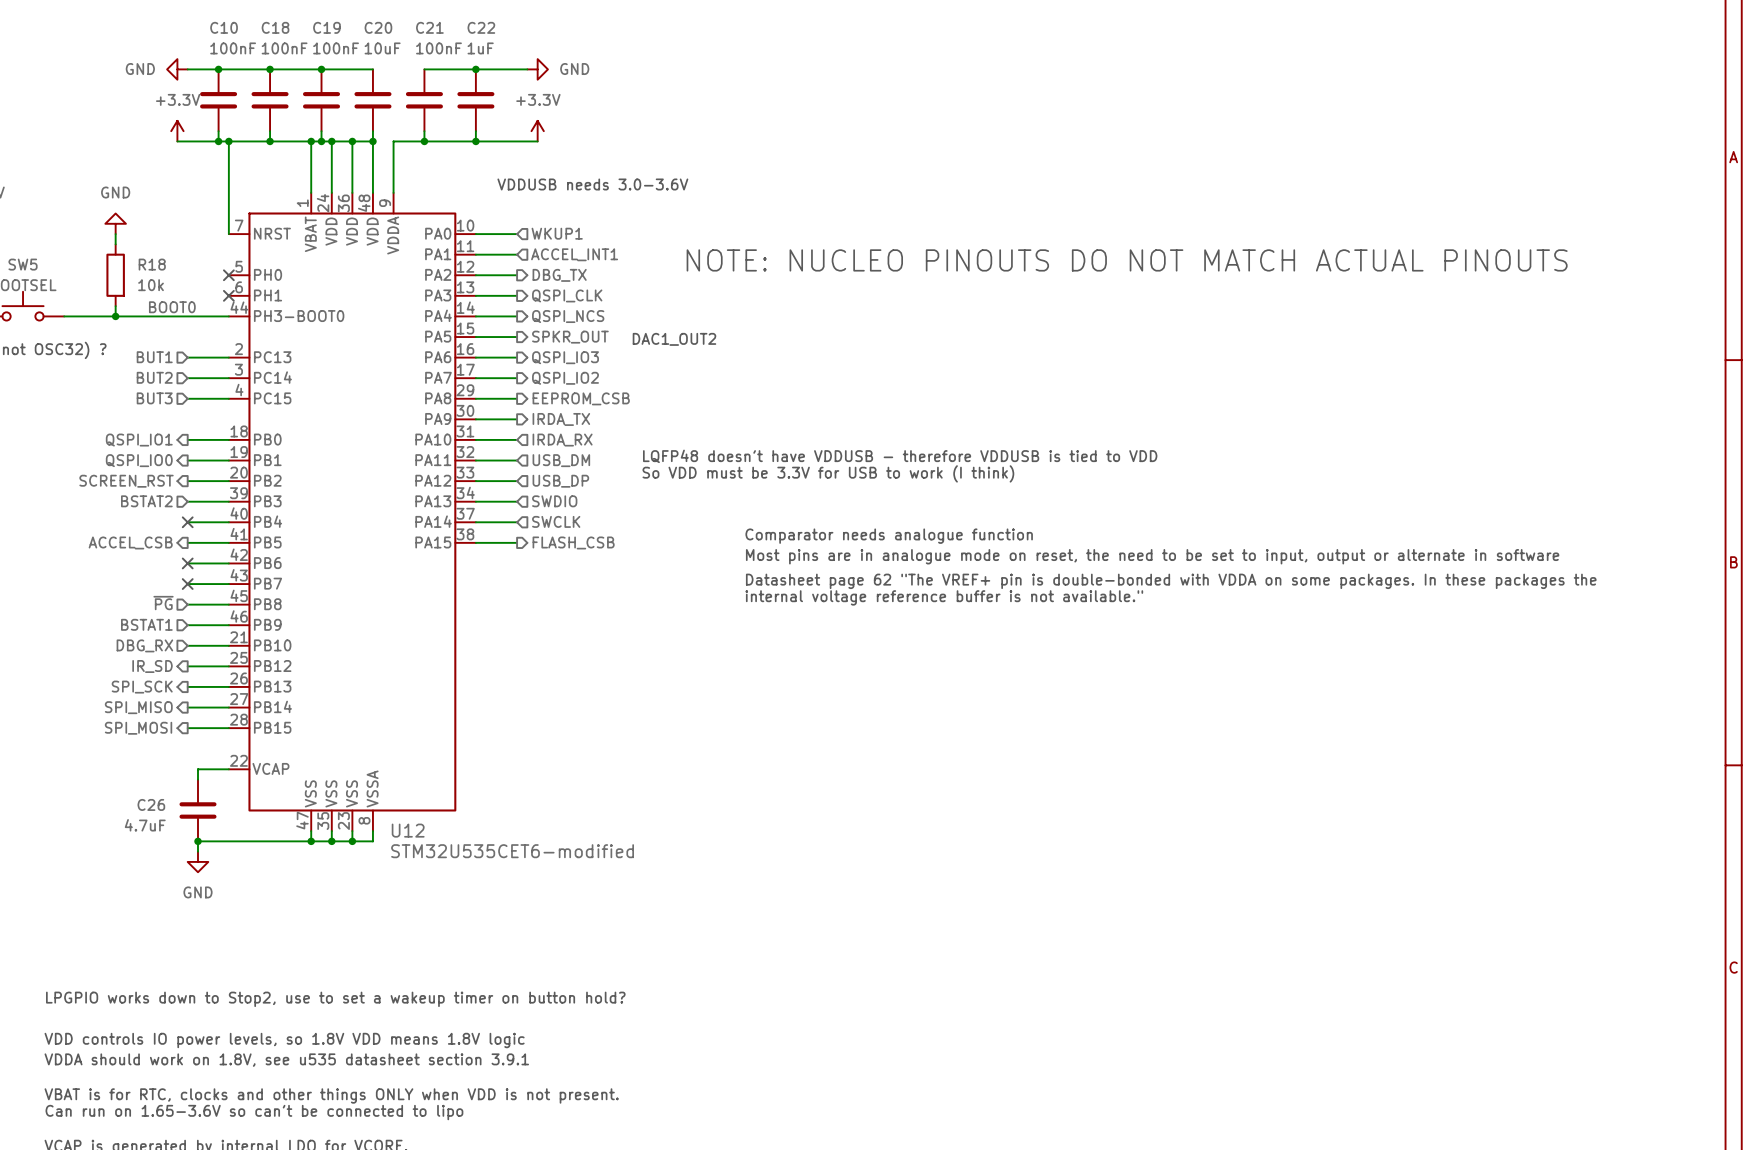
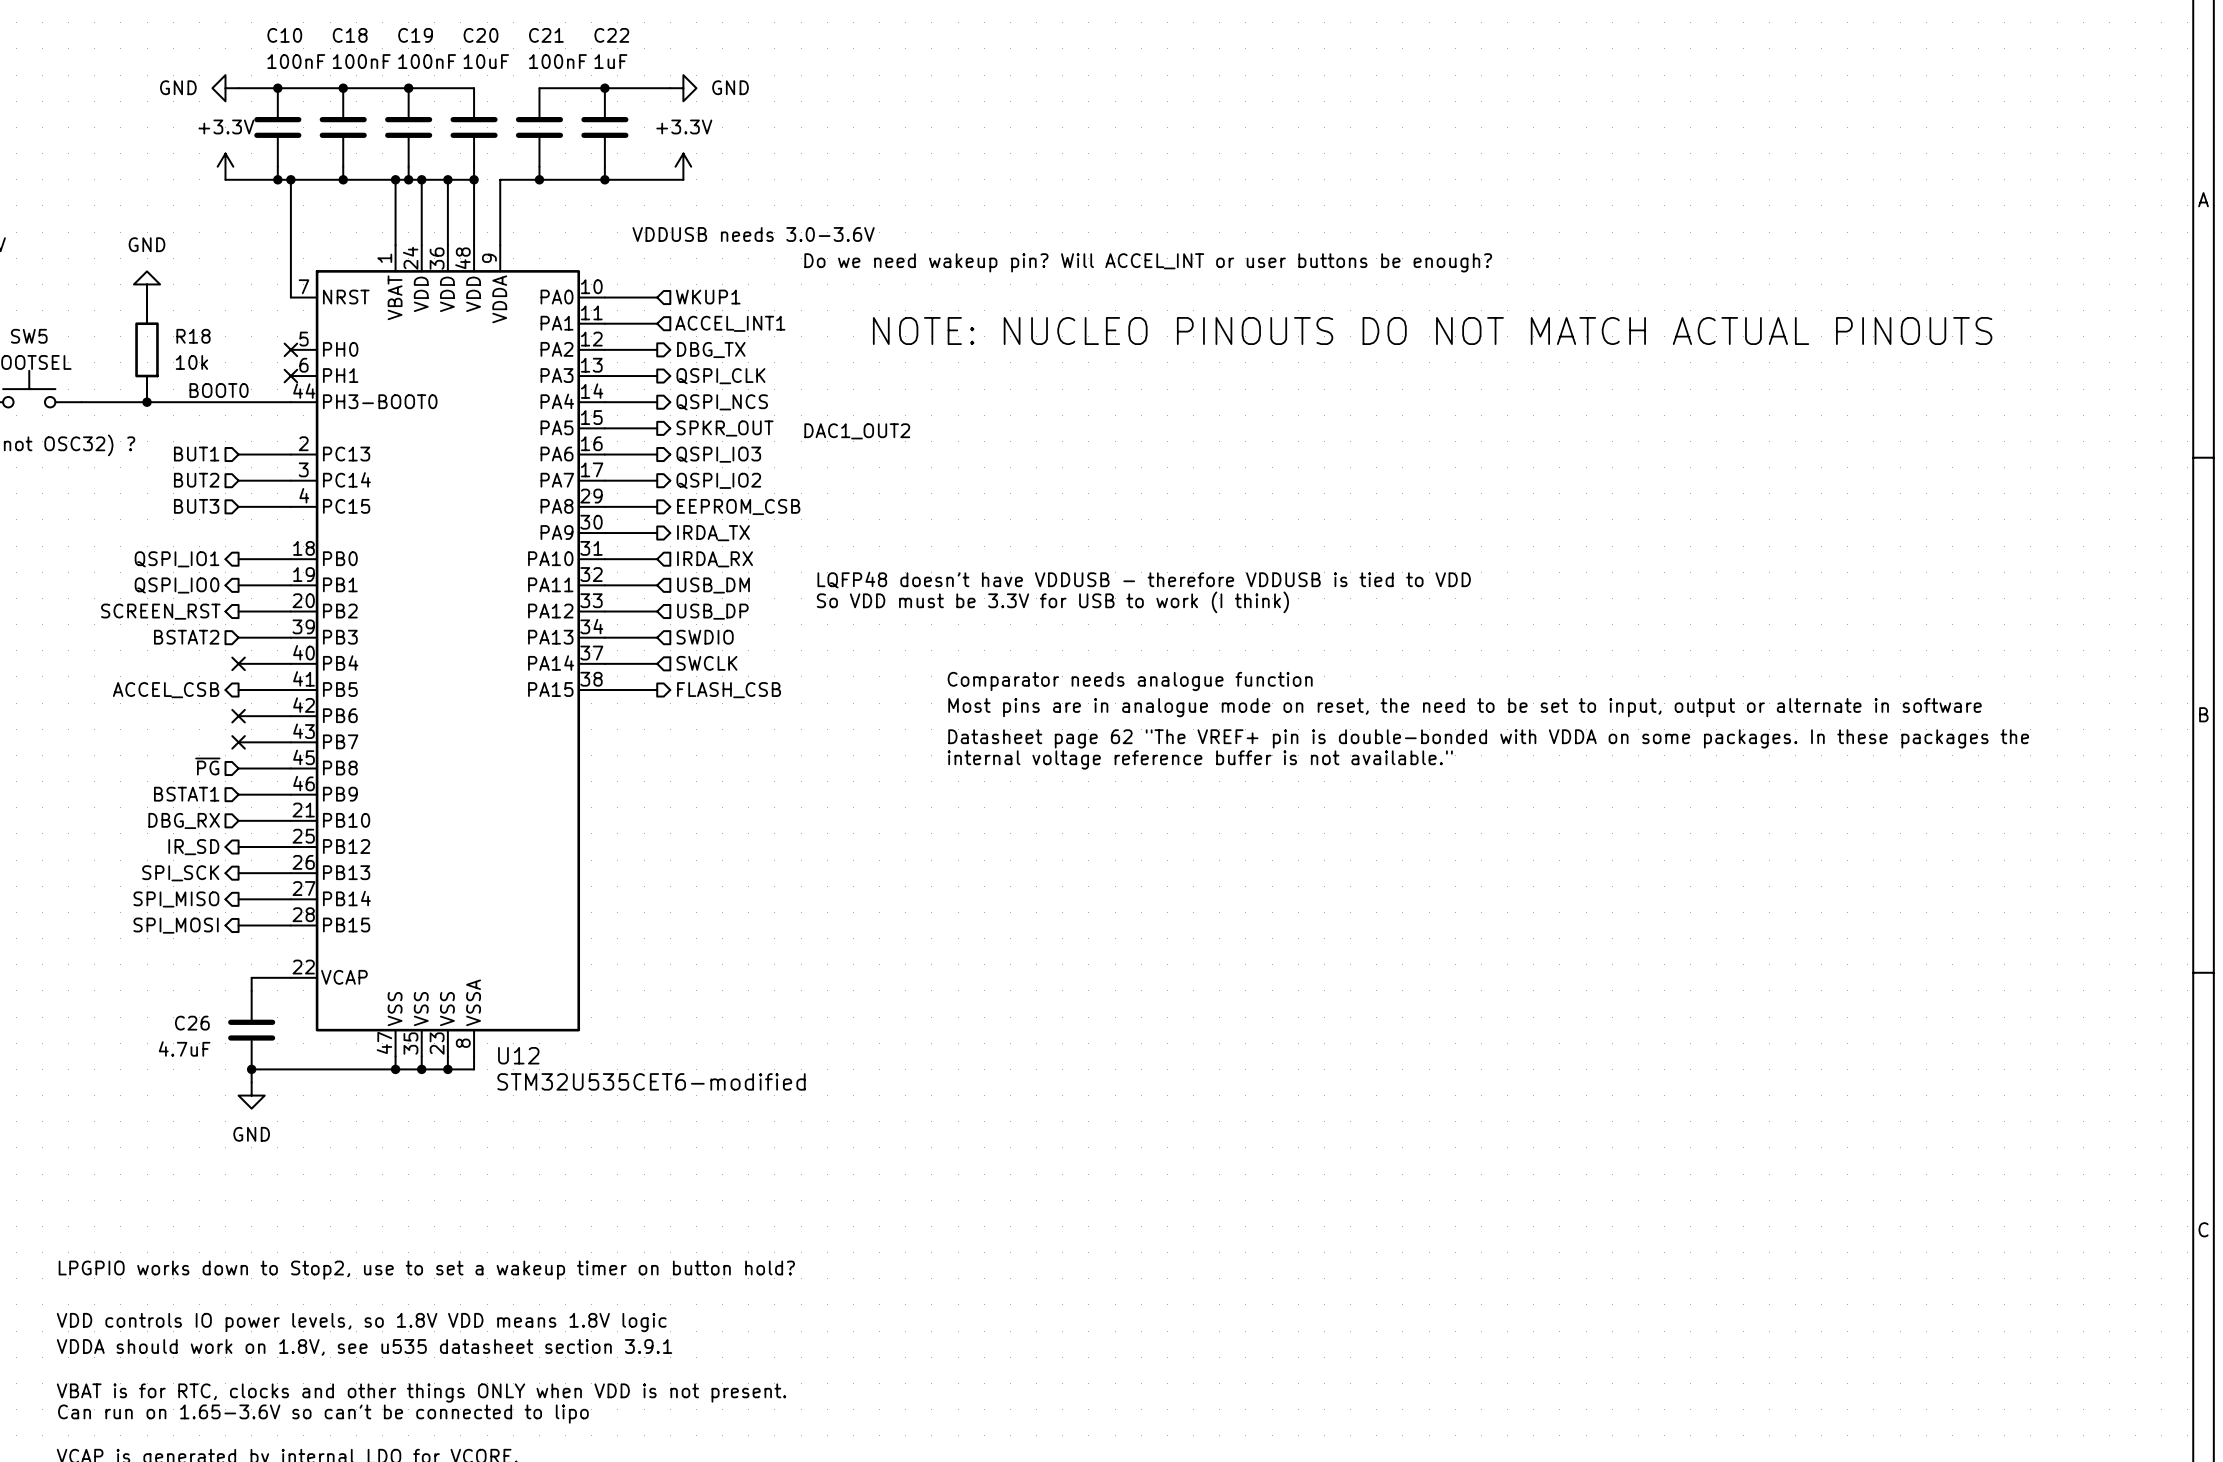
text: none -> Do we need wakeup pin? Will ACCEL_INT or user buttons be enough? (1148, 262)

